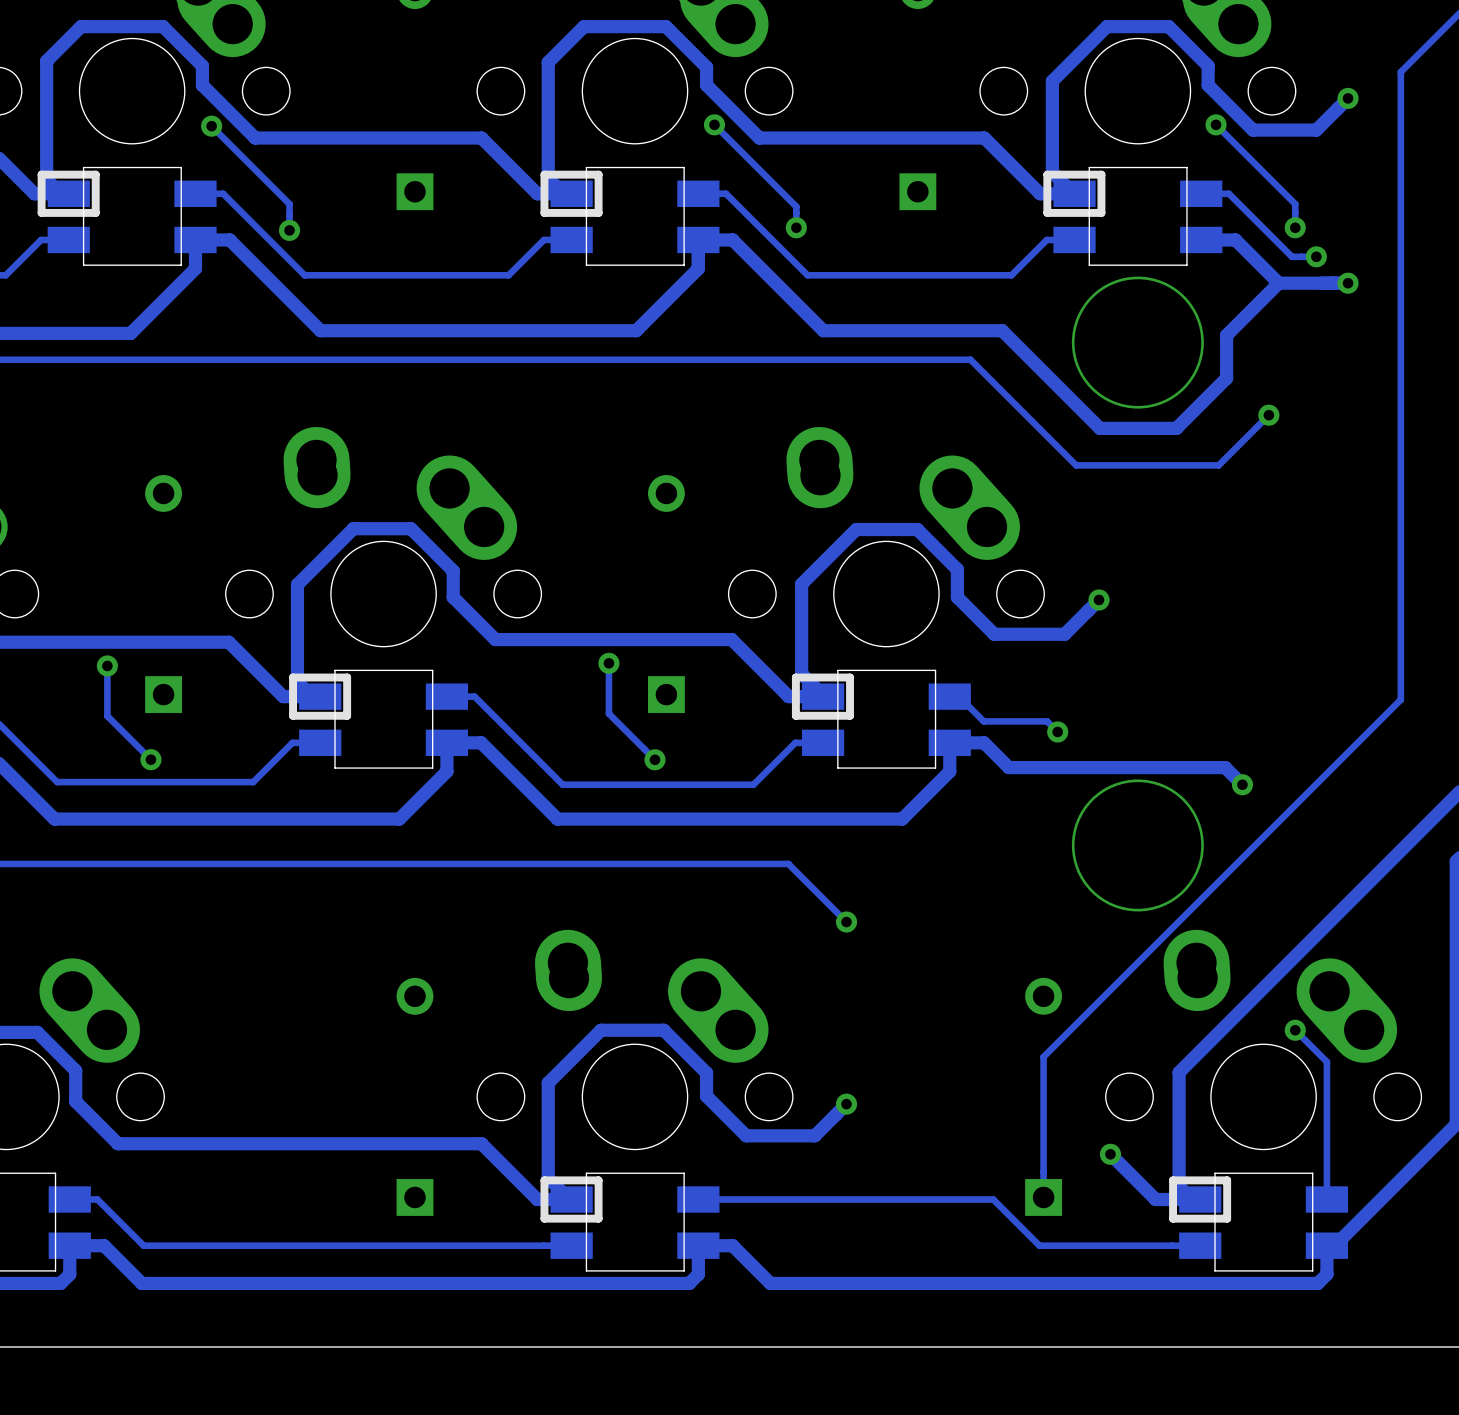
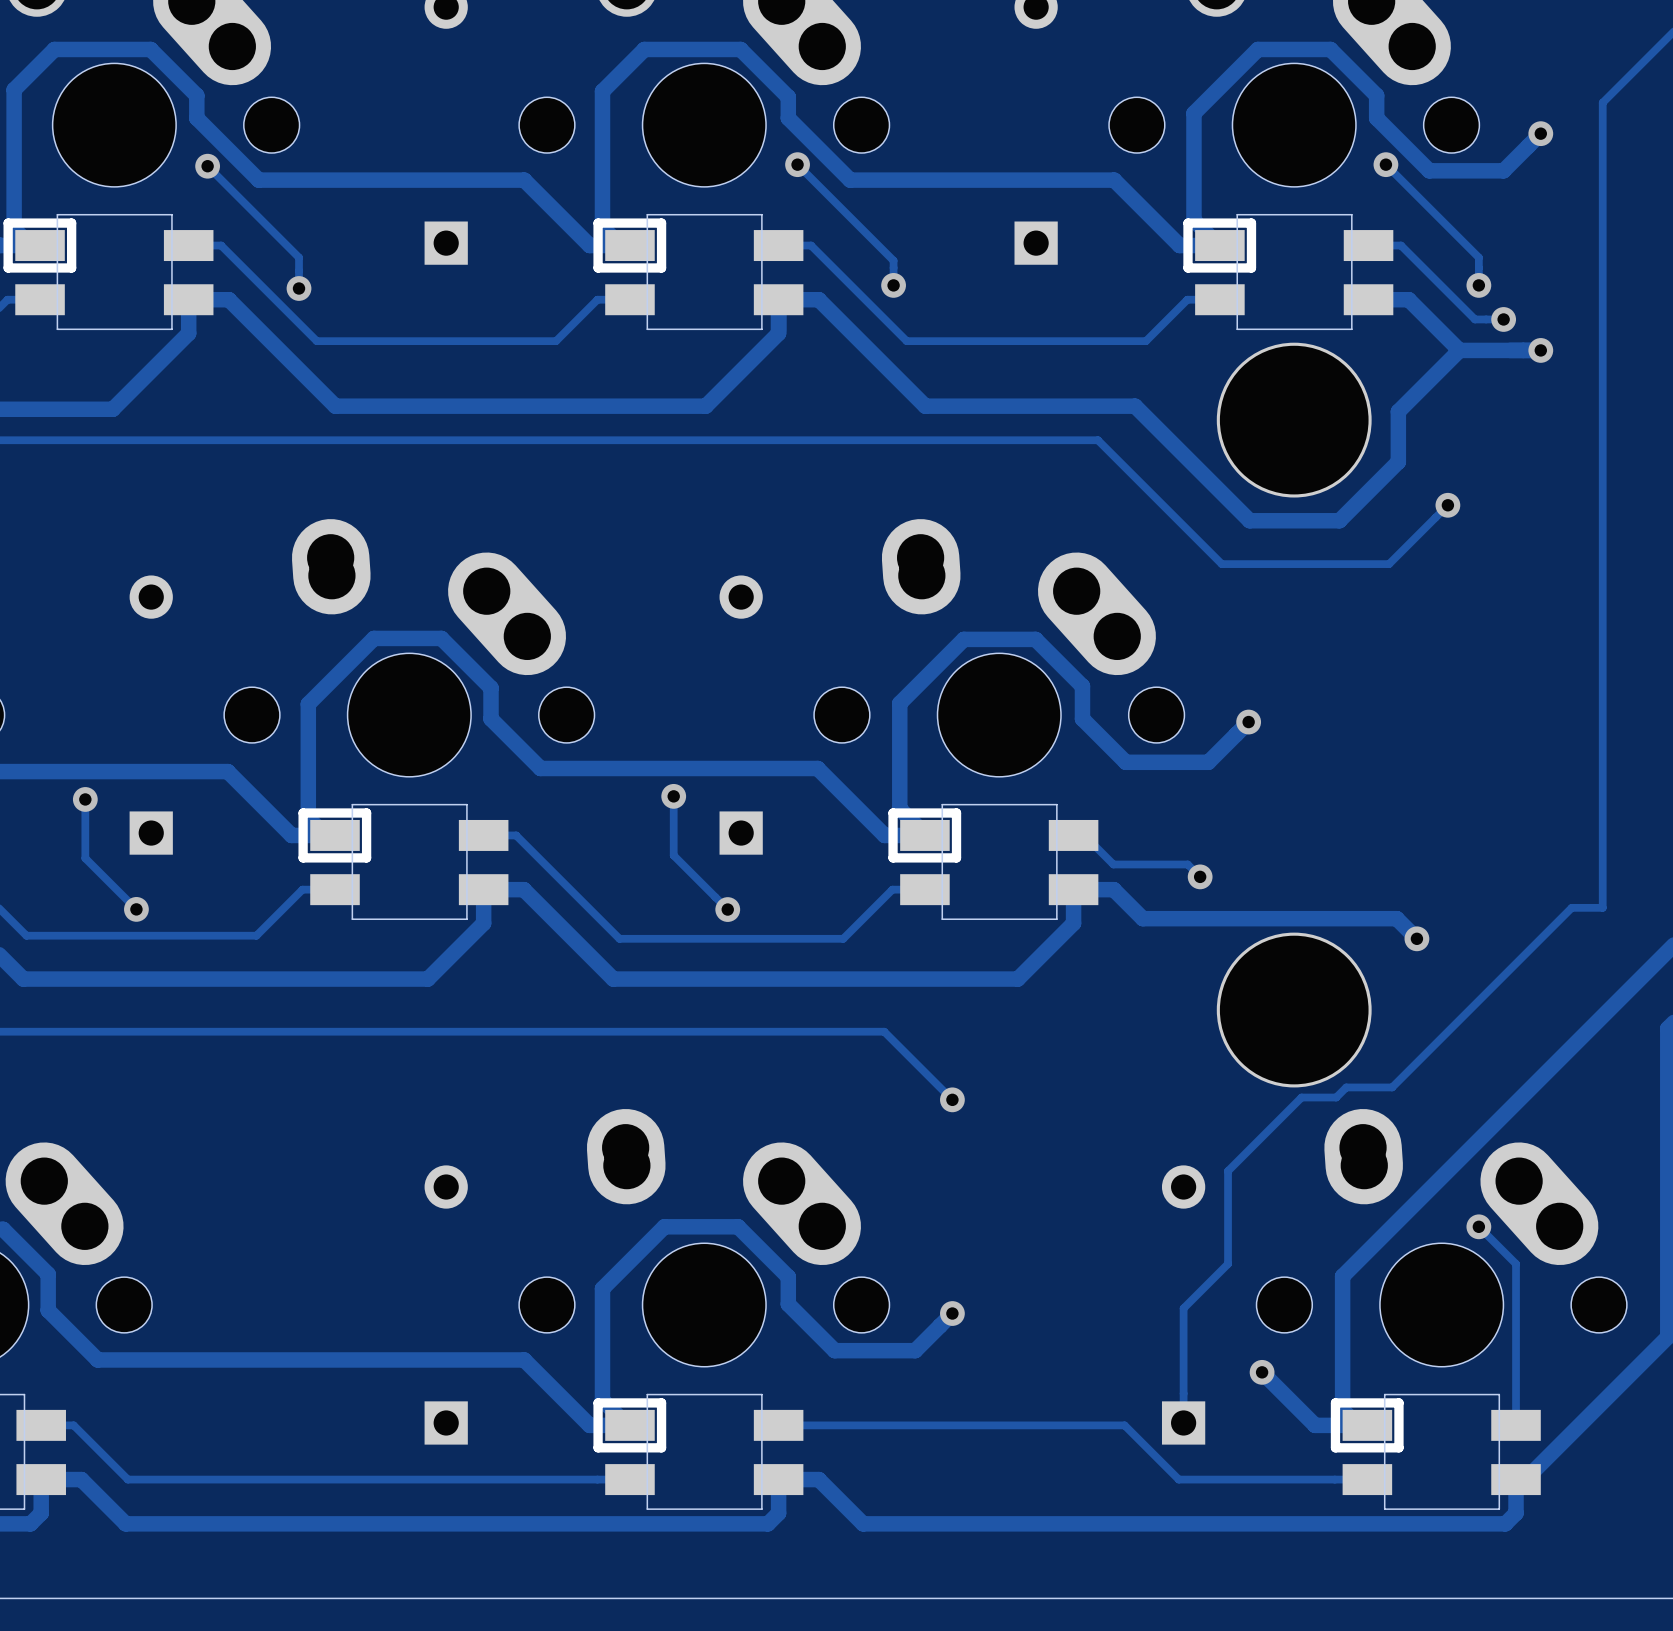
track: (1400, 699) (1043, 1056) (1043, 1099) -> (1602, 839) (1602, 907) (1571, 907) (1392, 1087) (1346, 1087) (1336, 1097) (1301, 1097) (1228, 1171) (1228, 1263) (1183, 1308)

